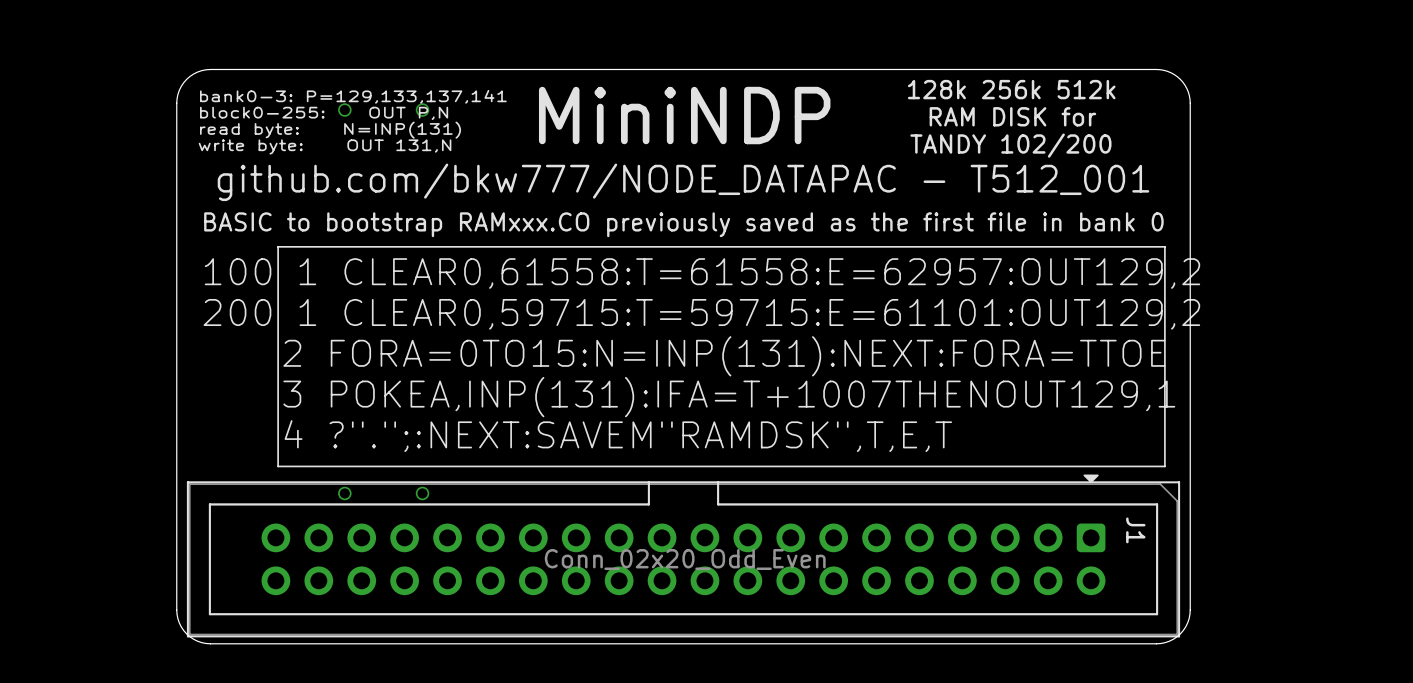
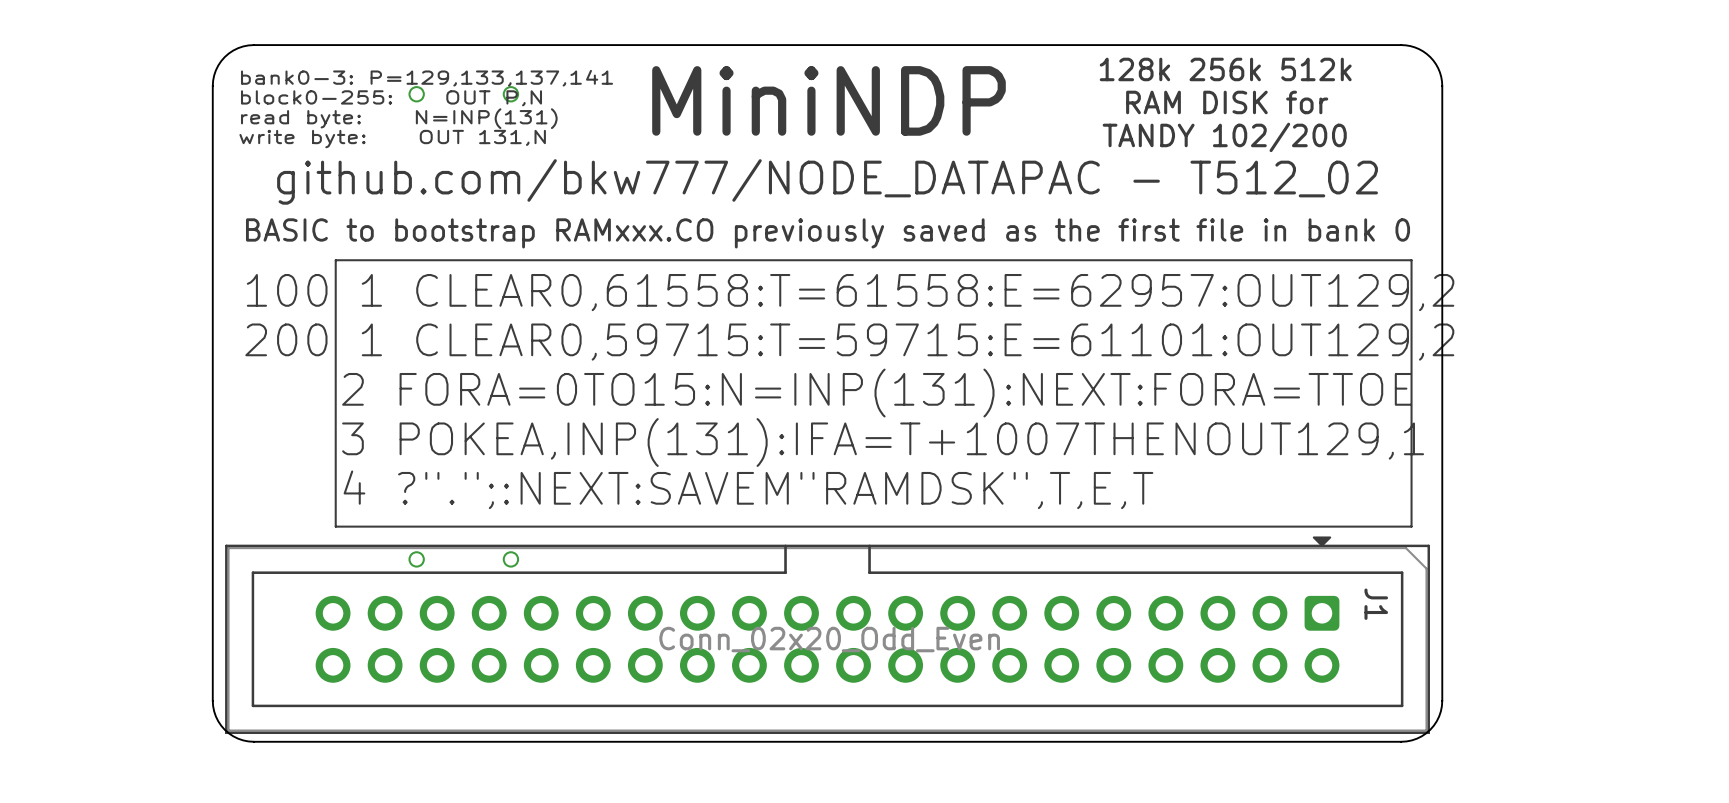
text: github.com/bkw777/NODE_DATAPAC - T512_001 (683, 182) -> github.com/bkw777/NODE_DATAPAC - T512_02 (827, 181)

